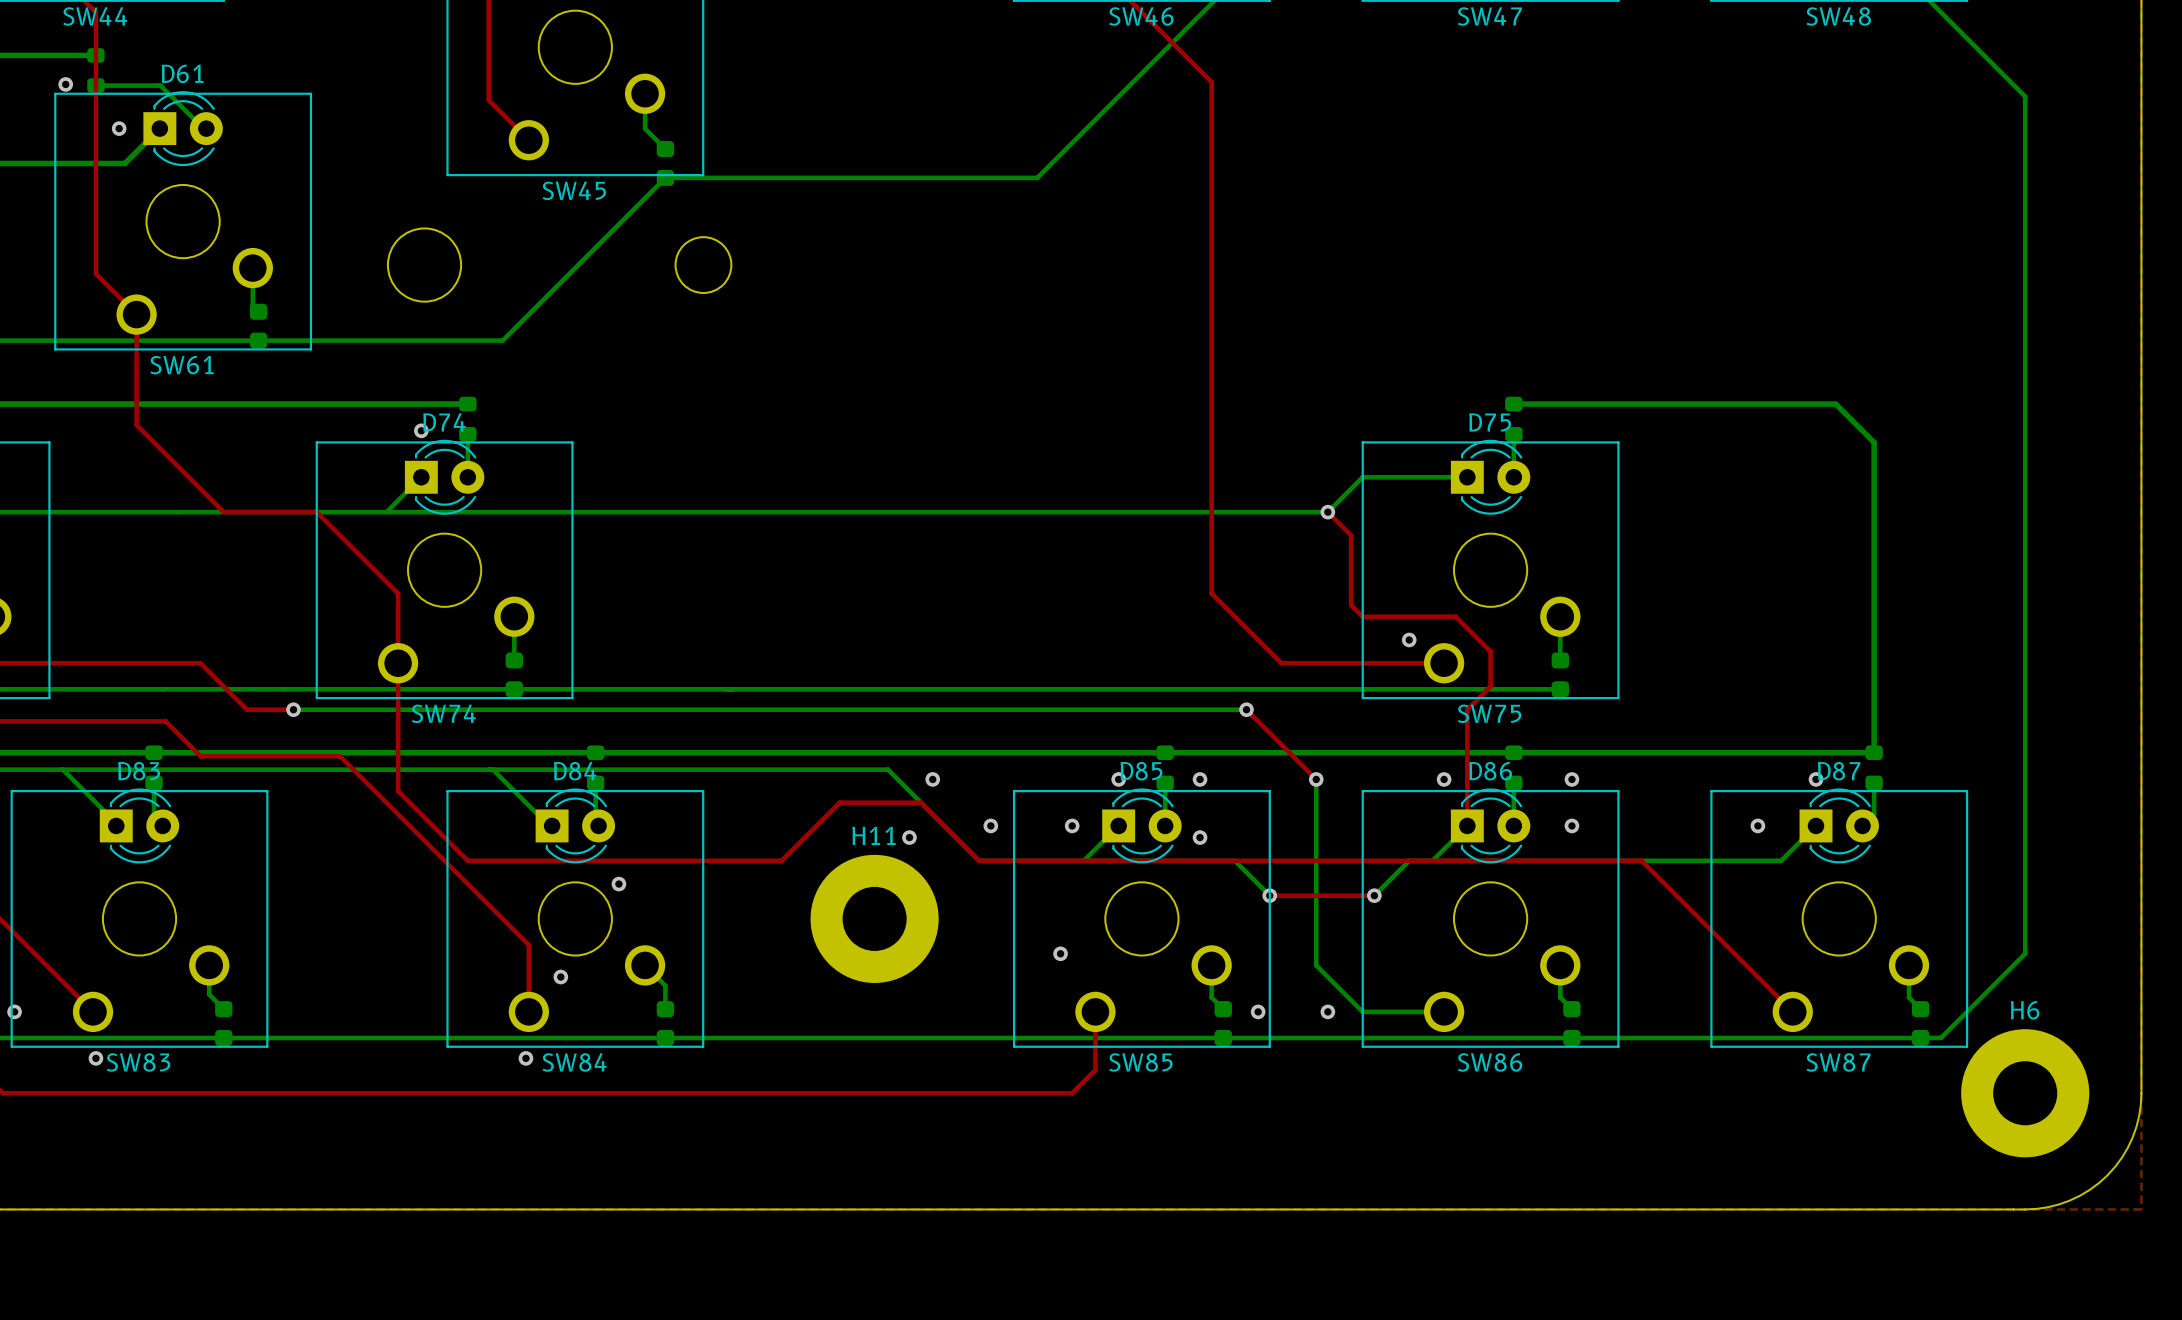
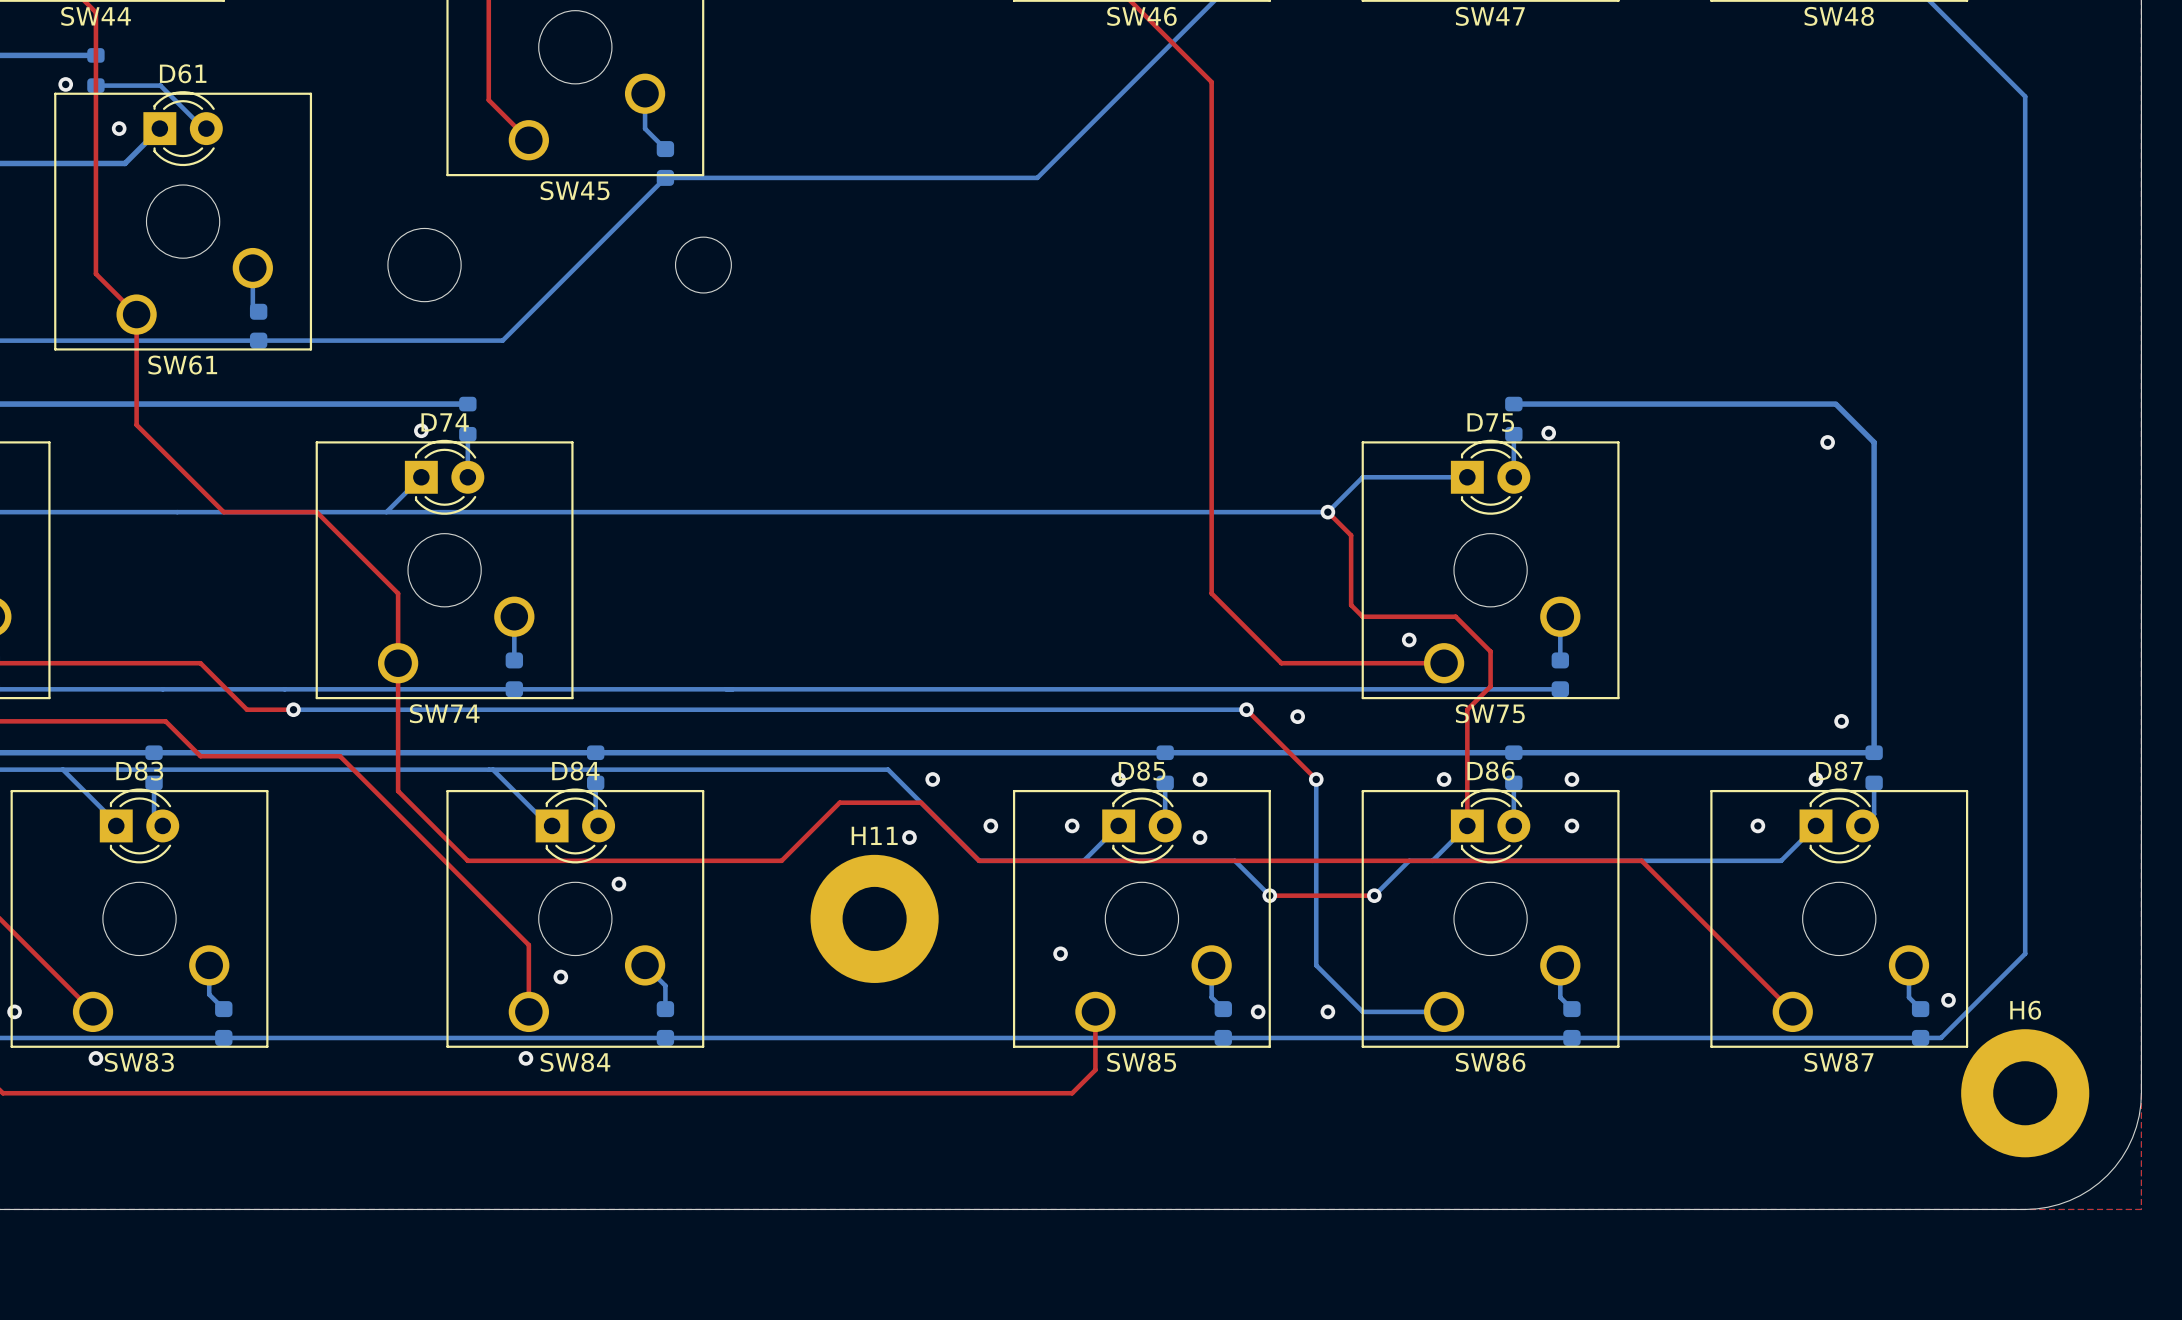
via: none -> (1548, 433)
via: none -> (1827, 442)
via: none -> (1297, 716)
via: none -> (1841, 721)
via: none -> (1948, 1000)

